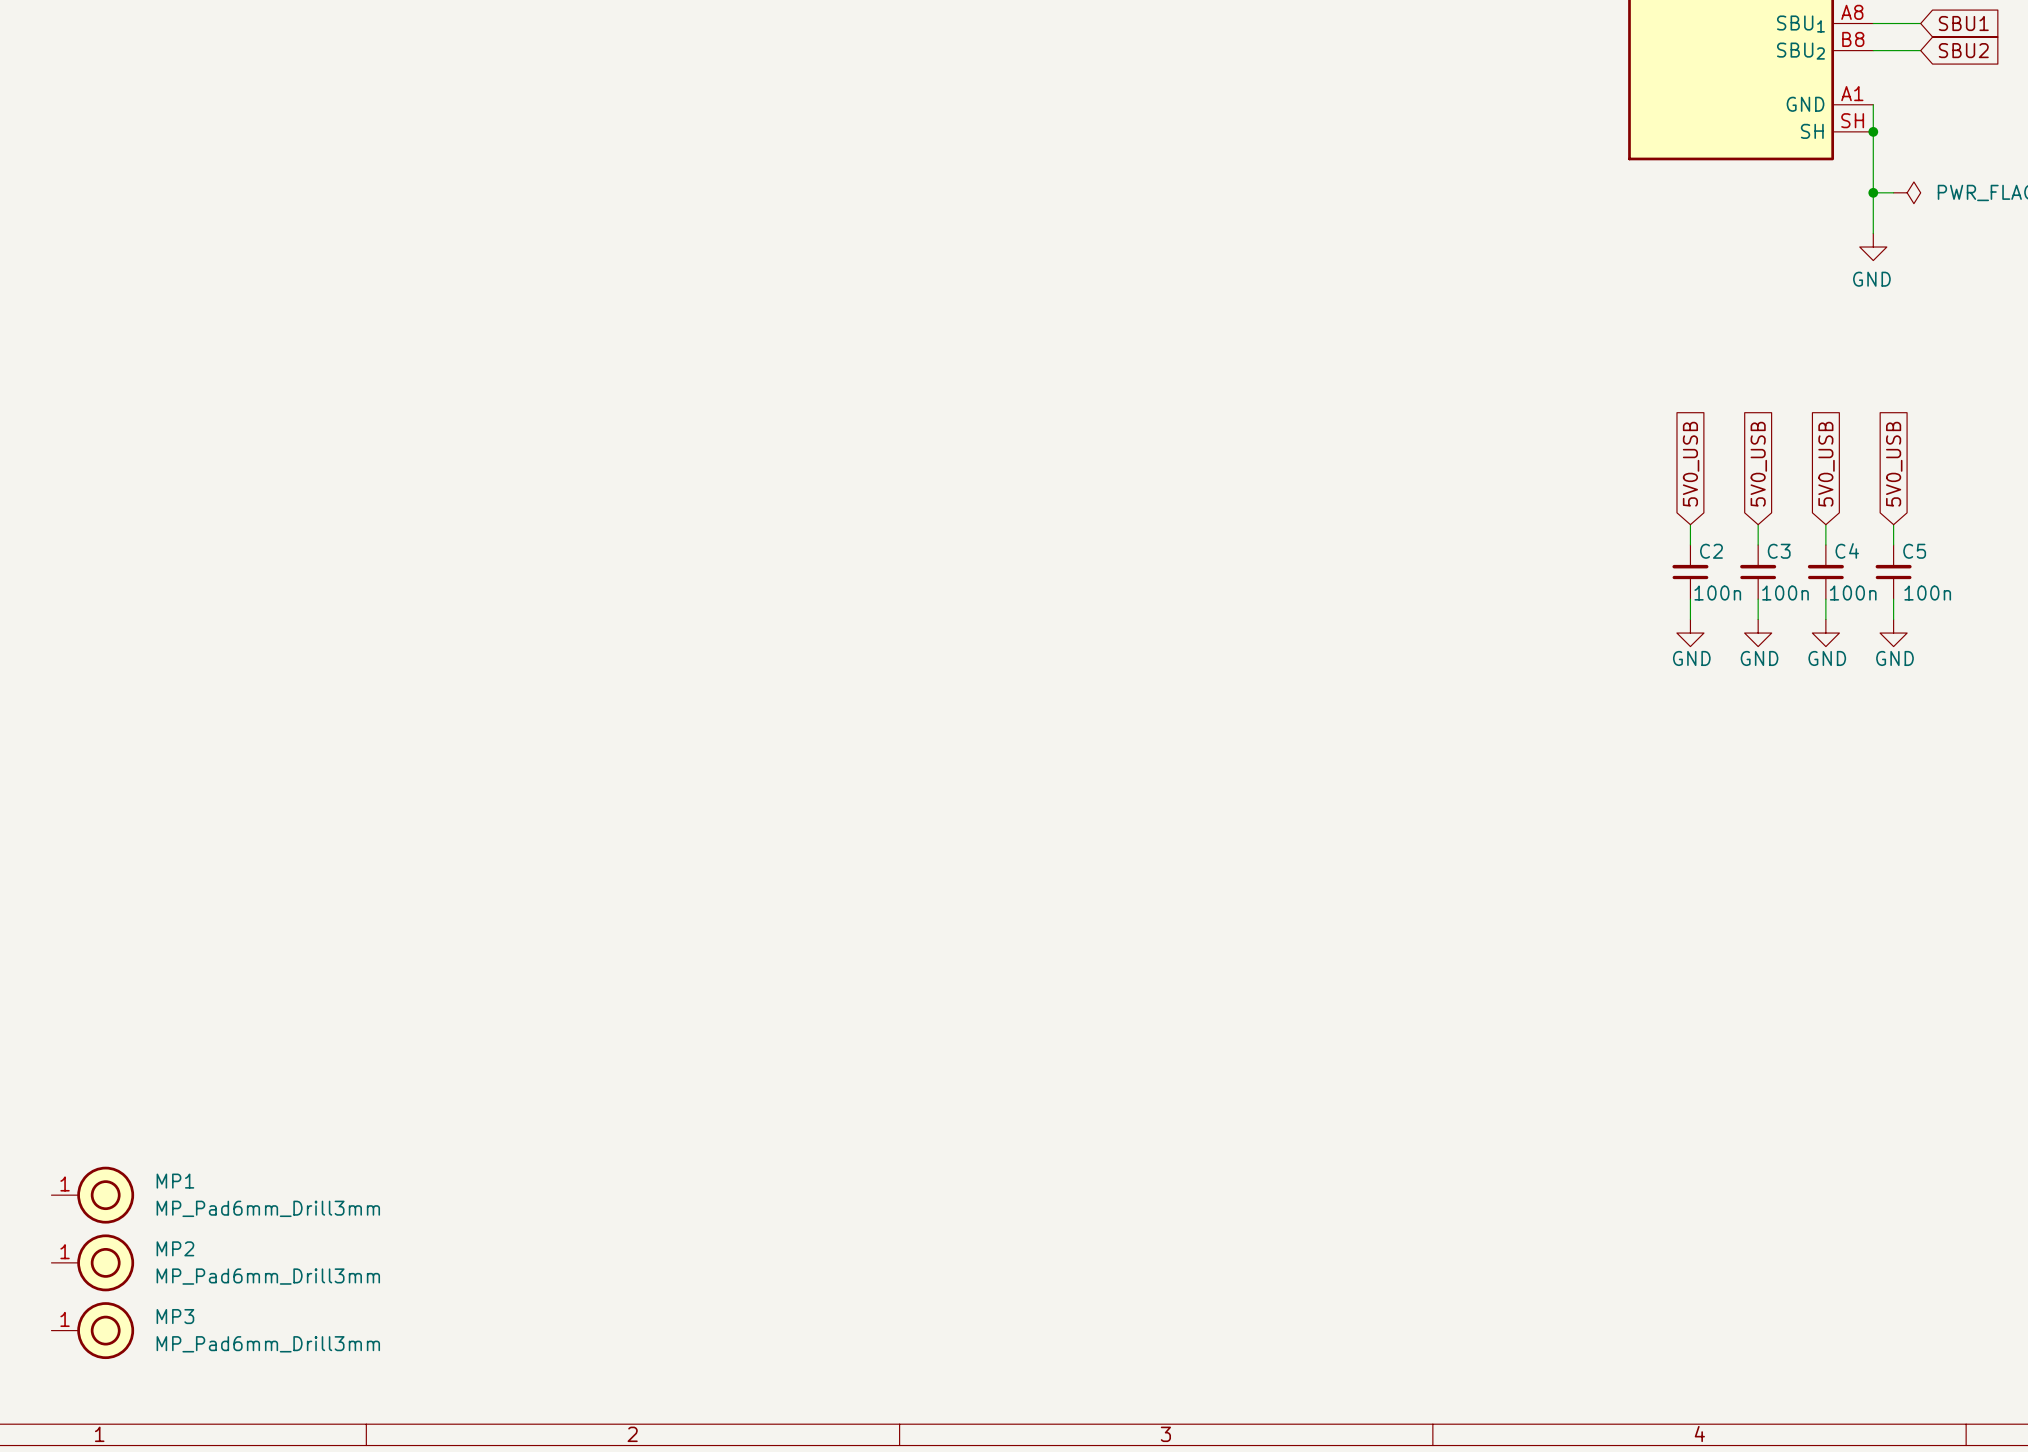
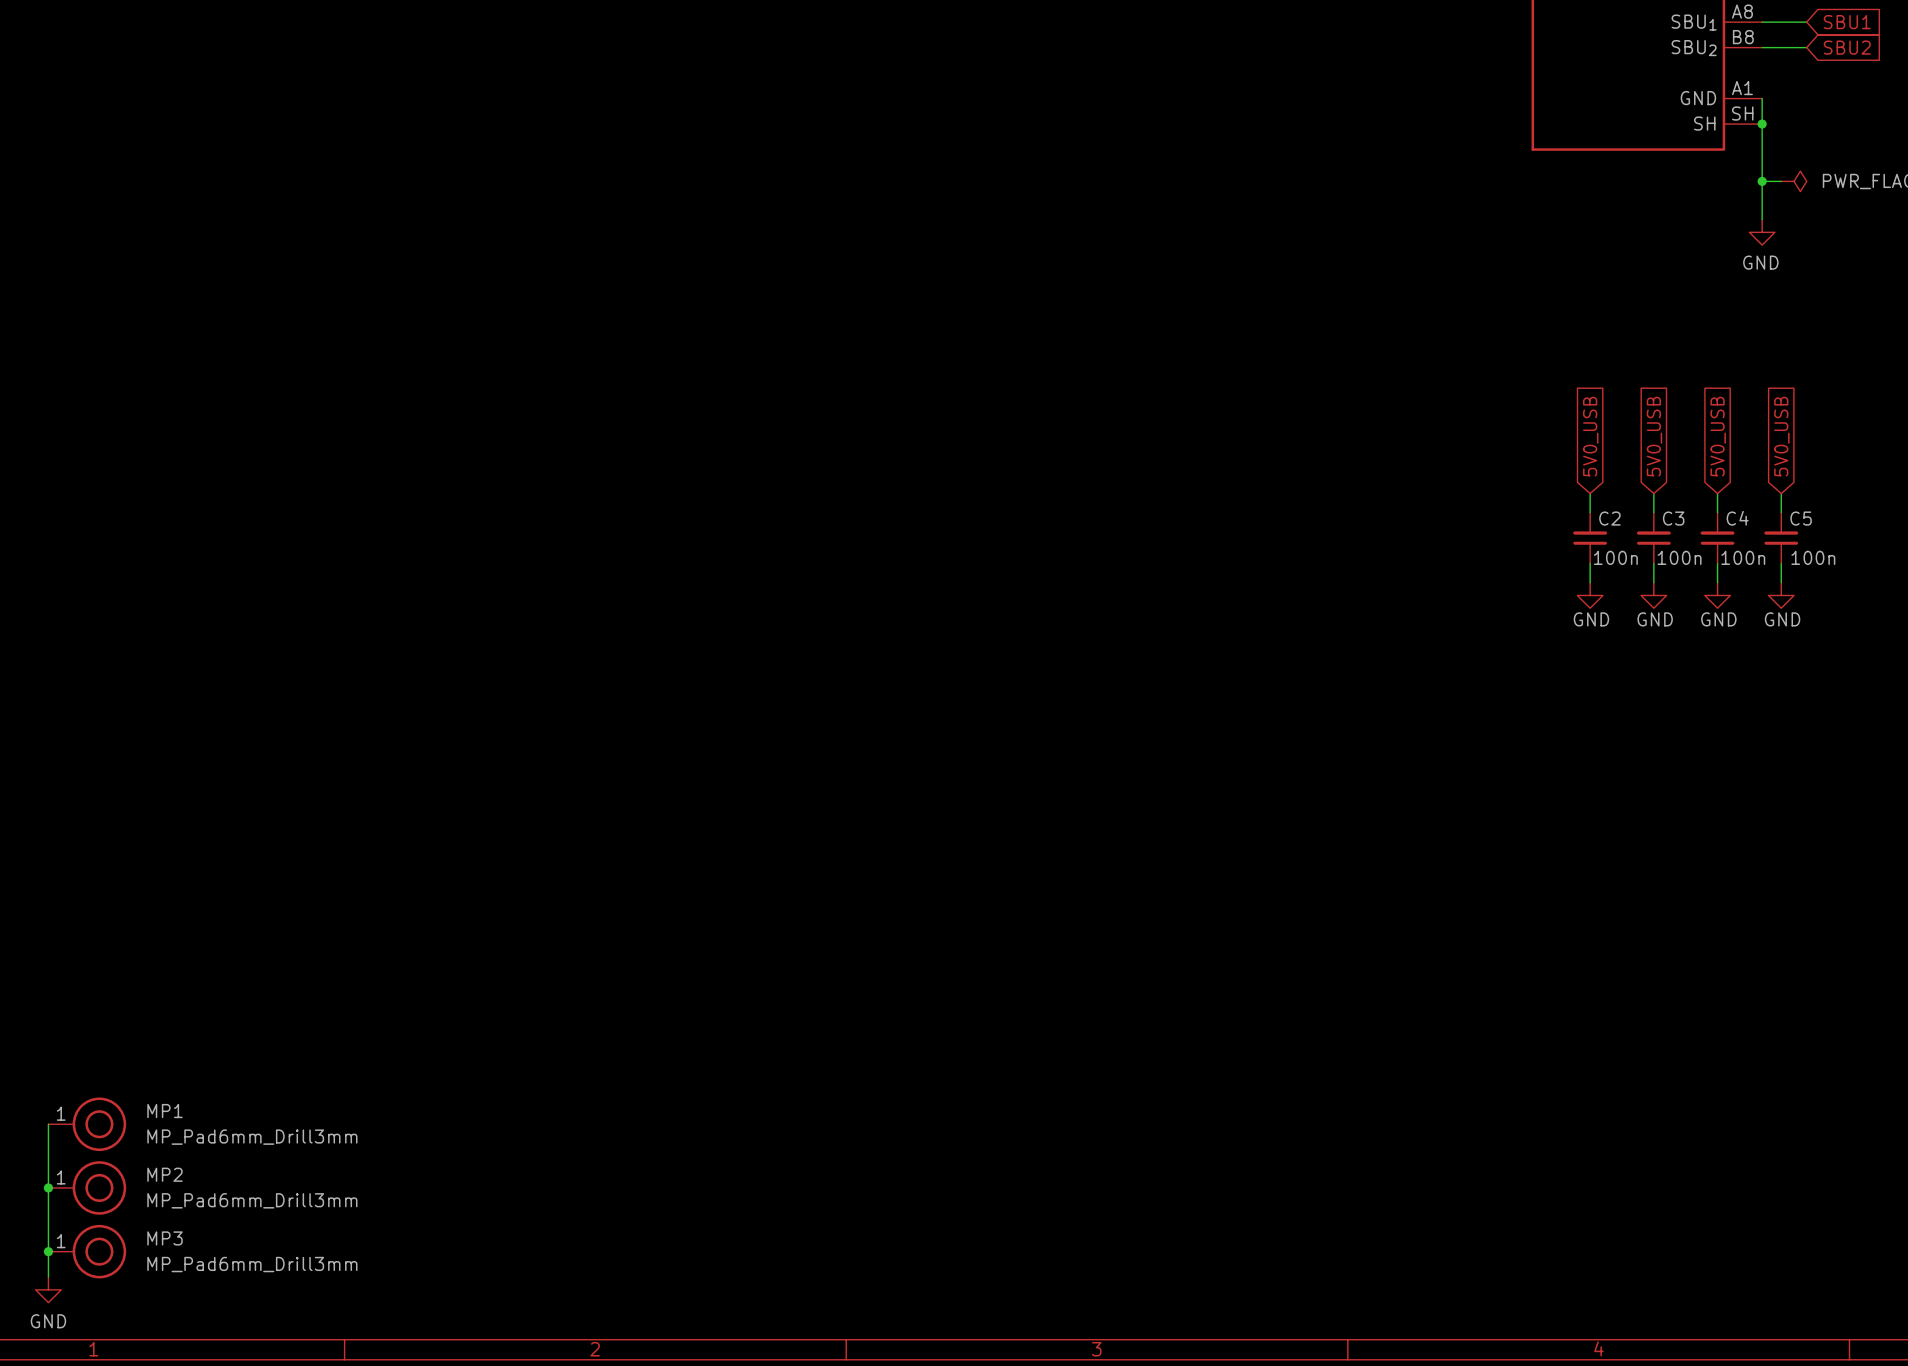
wire: none -> (48, 1124) (48, 1277)
junction: none -> (48, 1187)
junction: none -> (48, 1251)
power symbol: none -> GND (48, 1289)

